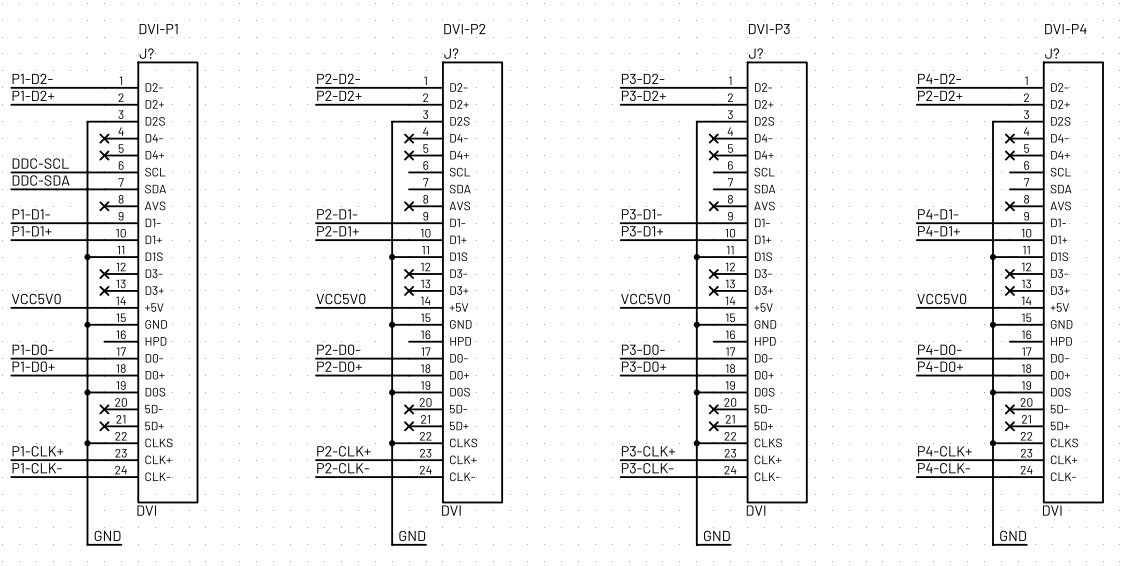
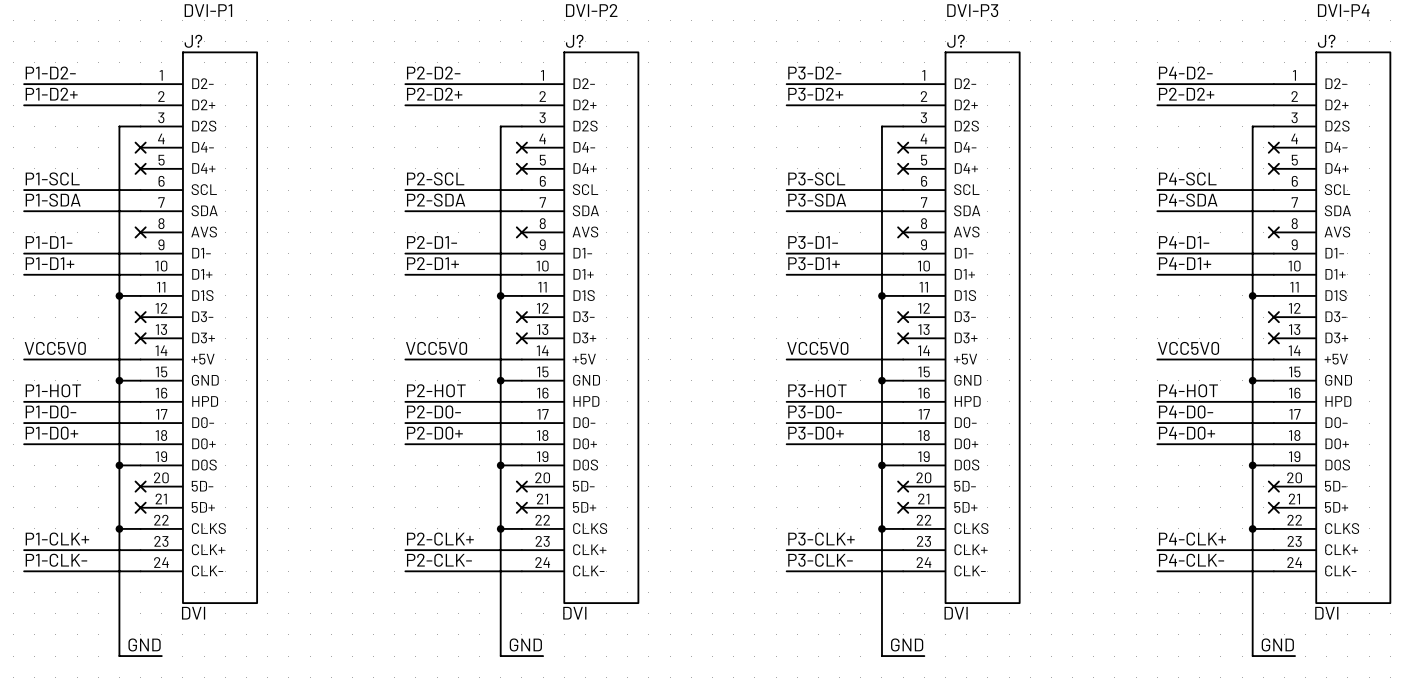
label: DDC-SCL (40, 163) -> P1-SCL (52, 178)
label: none -> P2-SCL (435, 178)
label: none -> P3-SCL (816, 178)
label: none -> P4-SCL (1187, 178)
wire: none -> (405, 190) (521, 190)
wire: none -> (786, 190) (903, 190)
wire: none -> (1157, 190) (1273, 190)
label: DDC-SDA (41, 180) -> P1-SDA (53, 200)
label: none -> P2-SDA (436, 200)
label: none -> P3-SDA (817, 200)
label: none -> P4-SDA (1188, 200)
wire: none -> (405, 211) (521, 211)
wire: none -> (786, 211) (903, 211)
wire: none -> (1157, 211) (1273, 211)
label: none -> P1-HOT (53, 390)
label: none -> P2-HOT (436, 390)
label: none -> P3-HOT (817, 390)
label: none -> P4-HOT (1188, 390)
wire: none -> (24, 401) (140, 401)
wire: none -> (405, 401) (521, 401)
wire: none -> (786, 401) (903, 401)
wire: none -> (1157, 401) (1273, 401)

